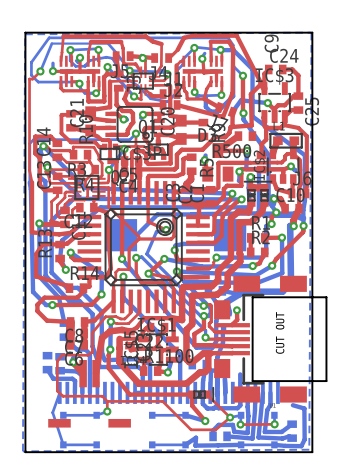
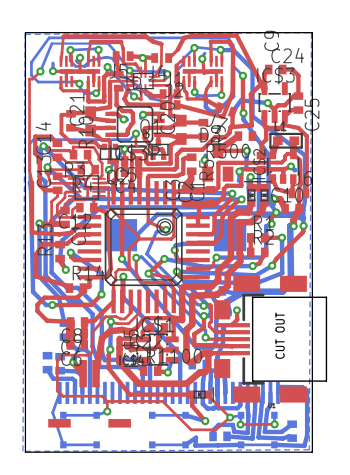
bottom track: (240, 374) (240, 392) -> none
bottom track: (292, 405) (304, 408) (304, 439) (301, 446) (274, 444) -> (277, 392) (279, 386) (302, 387) (307, 390) (307, 435) (304, 445) (274, 444)

